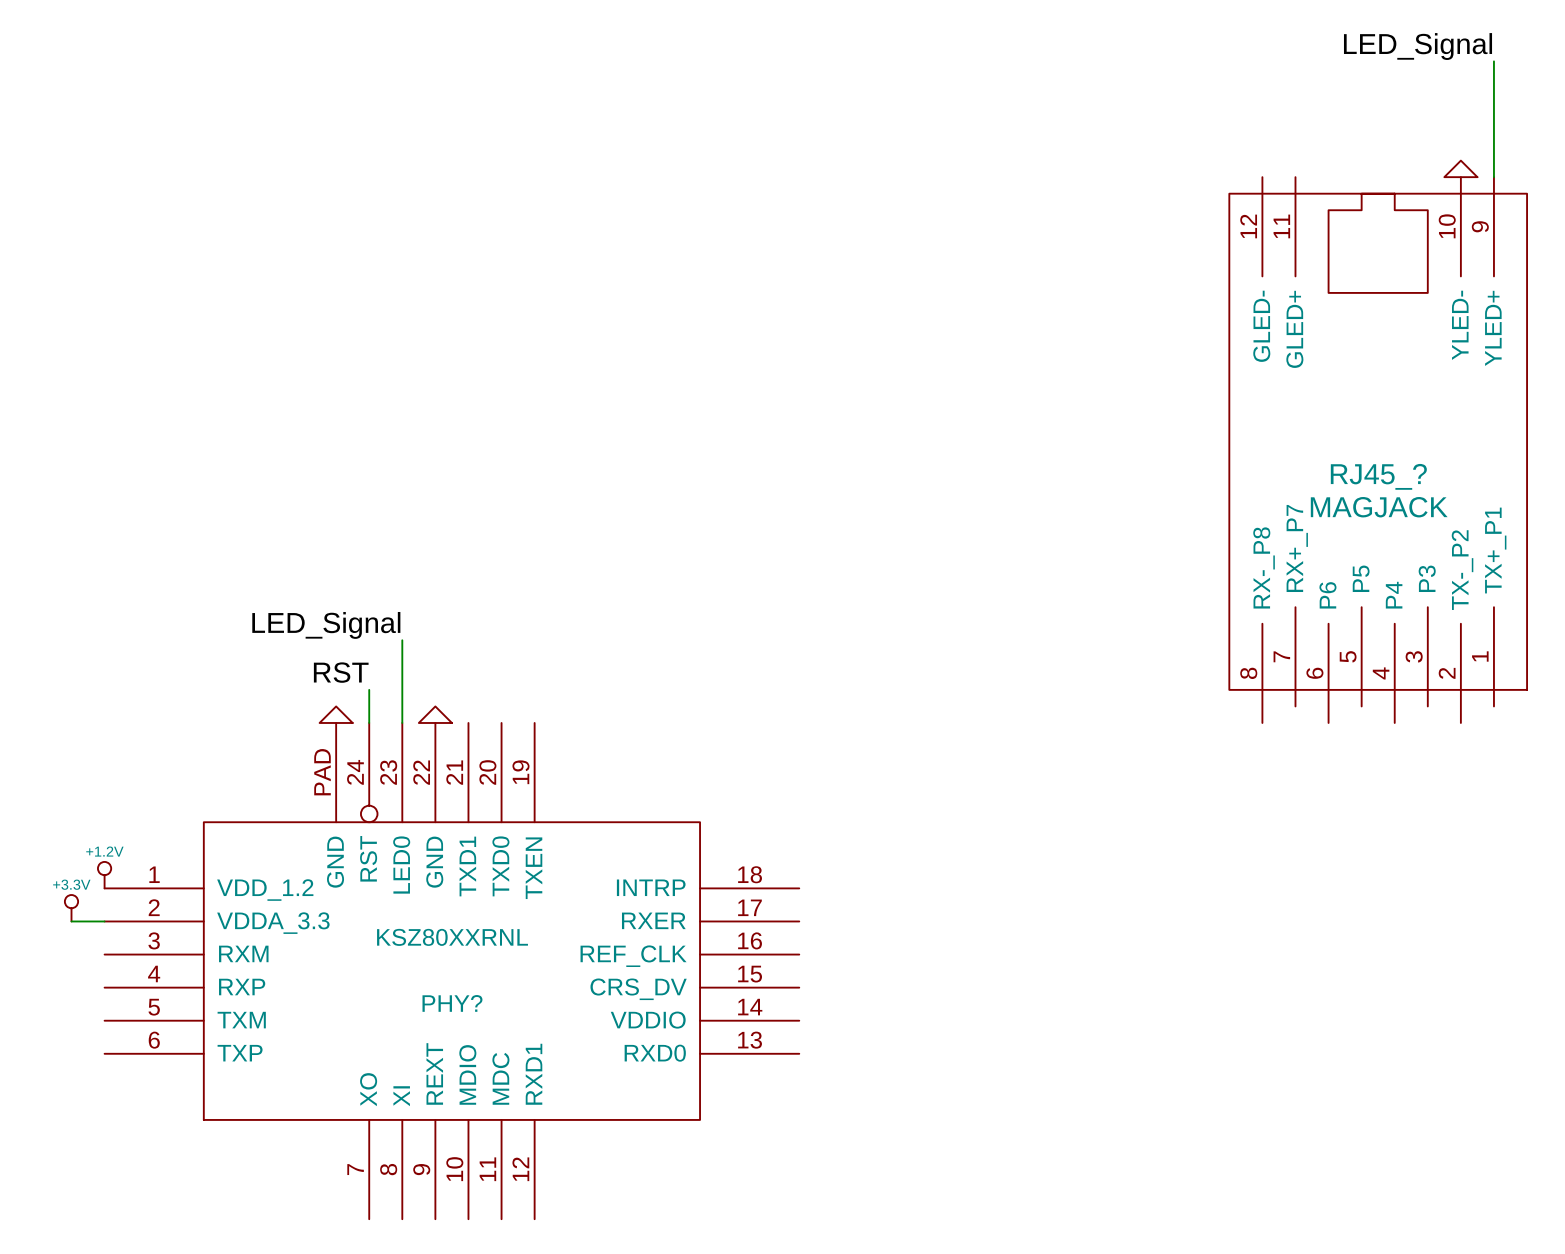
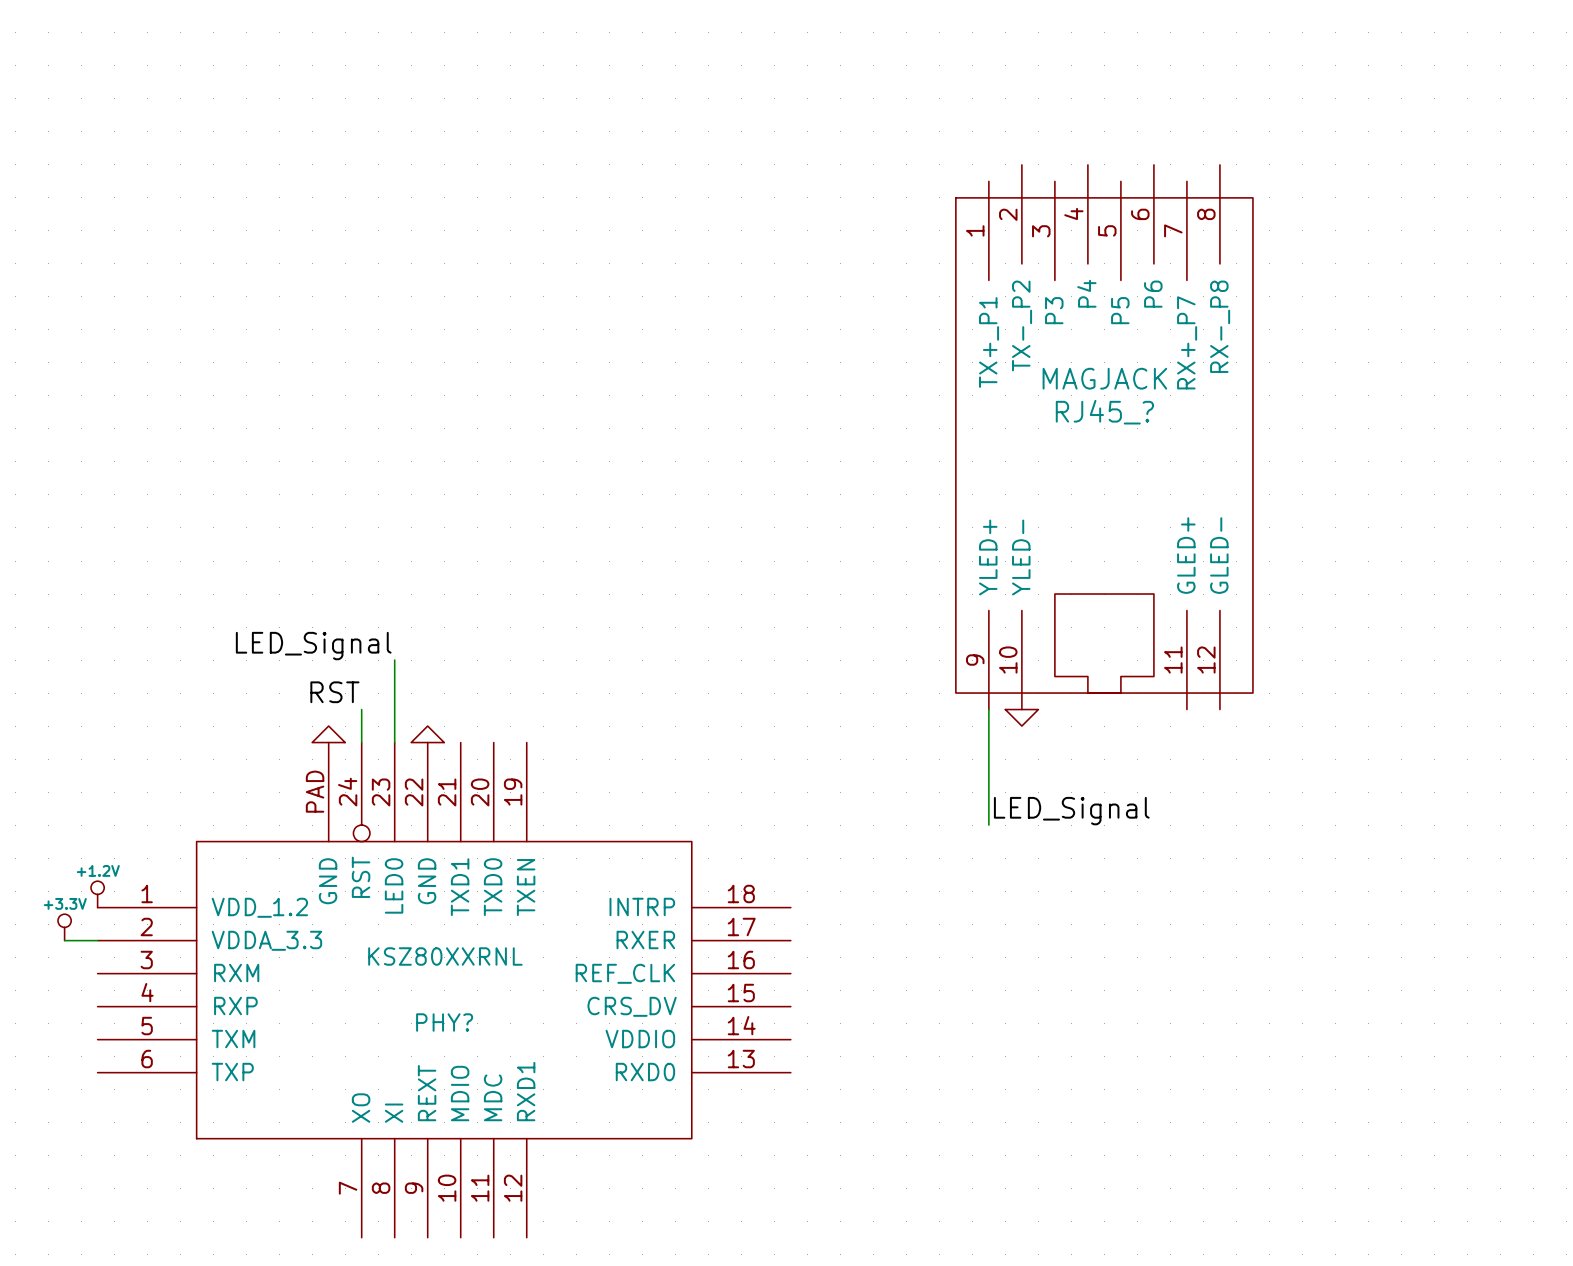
label: LED_Signal (1418, 46) -> none
wire: (1493, 61) (1493, 177) -> none
power symbol: (1460, 168) -> none
RJ45_? rotation: 0° (1378, 441) -> 180° (1104, 445)
wire: none -> (988, 709) (988, 825)
power symbol: none -> (1021, 717)
label: none -> LED_Signal (1071, 811)

